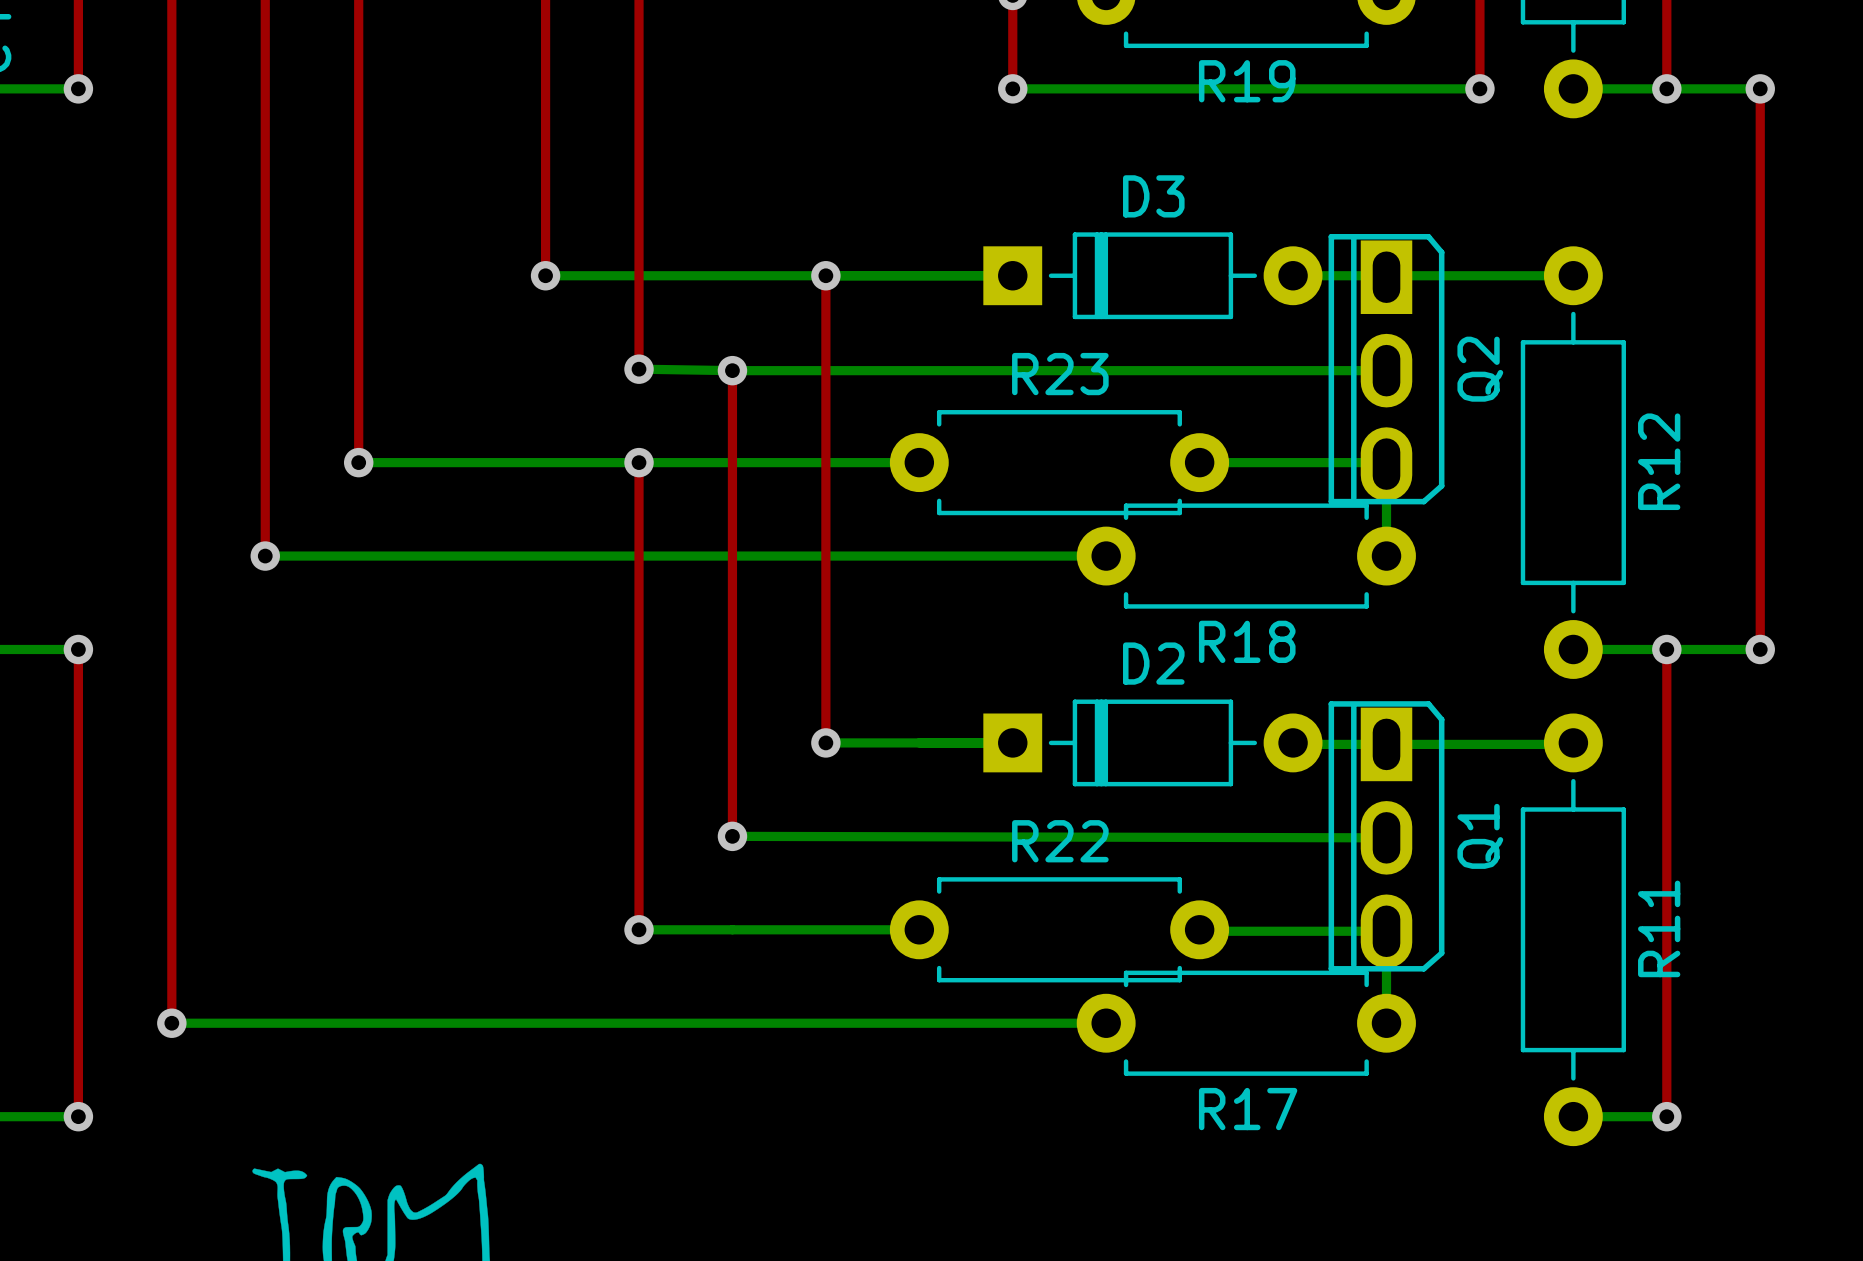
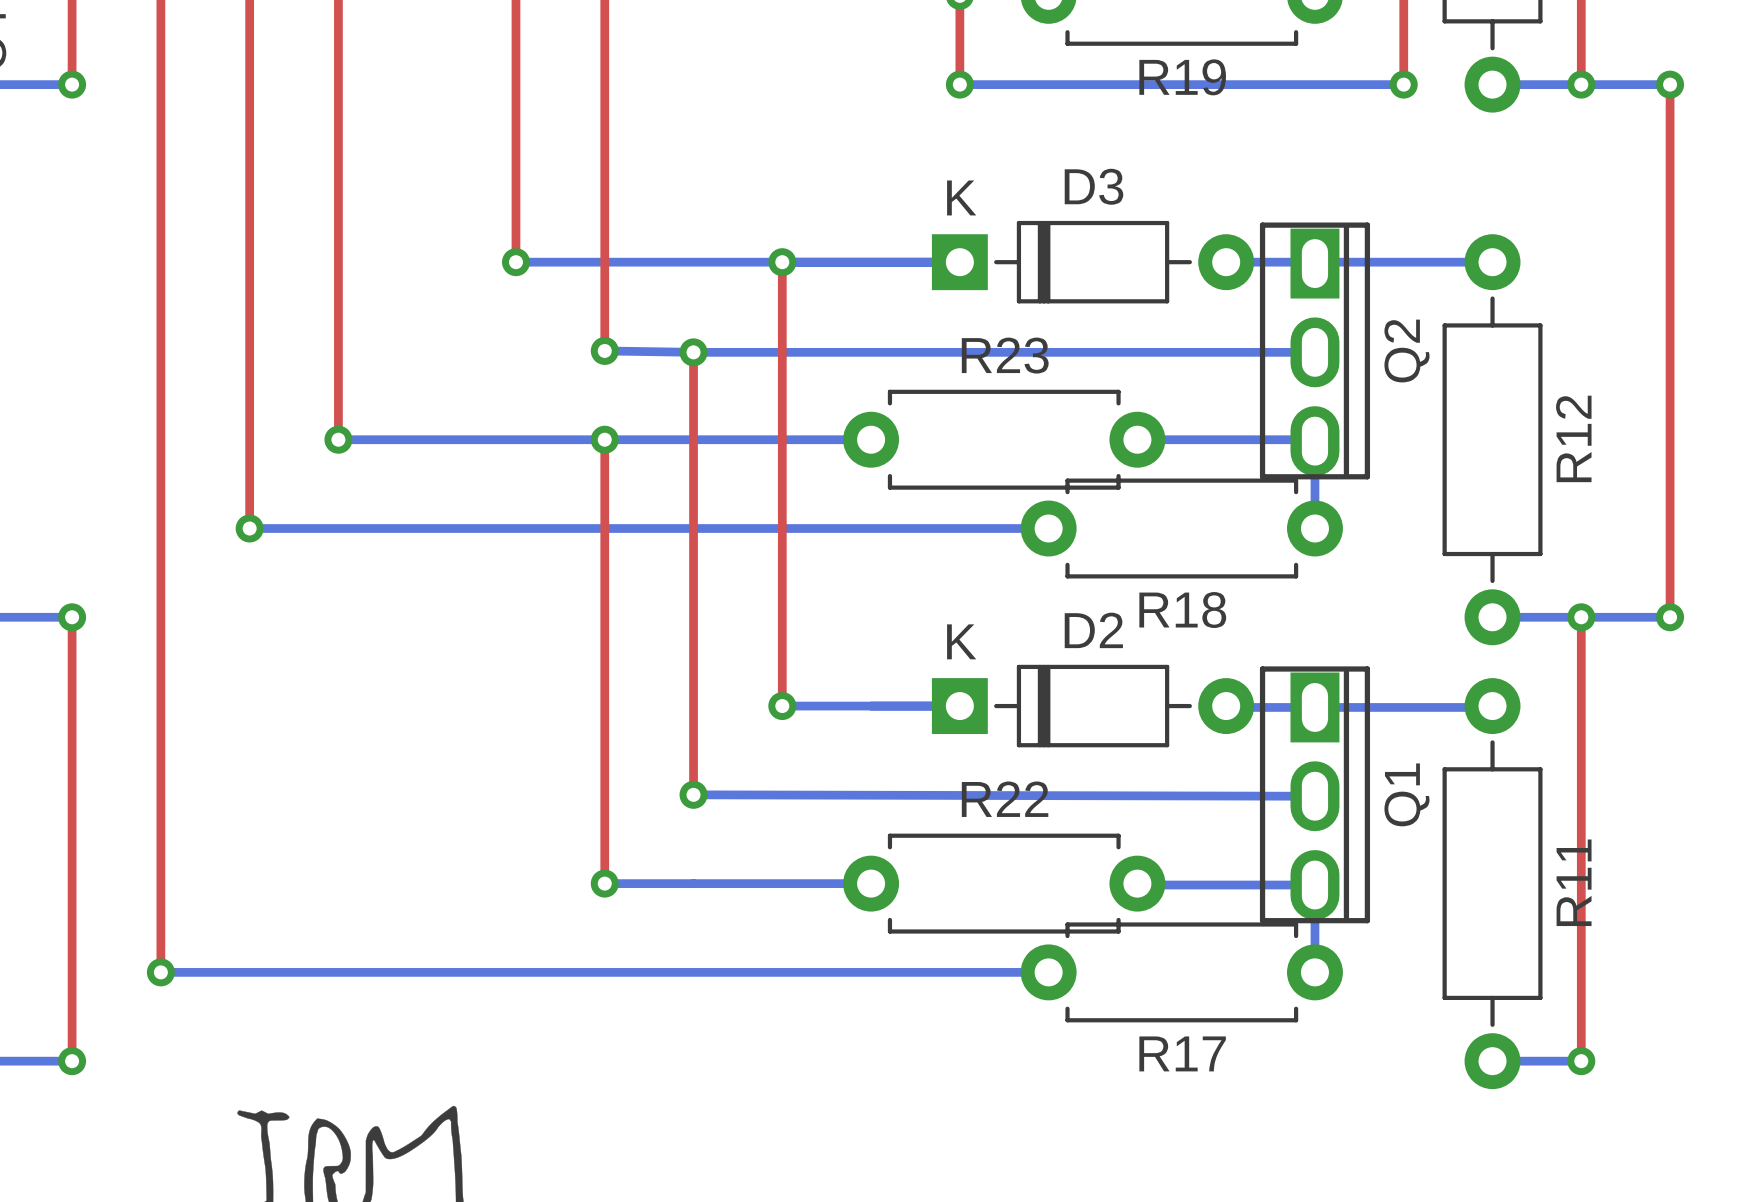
D3 text: none -> K (961, 197)
Q2 footprint: [1328, 233, 1445, 505] -> [1259, 222, 1371, 480]
D2 text: none -> K (961, 641)
Q1 footprint: [1328, 701, 1445, 972] -> [1259, 666, 1371, 924]

